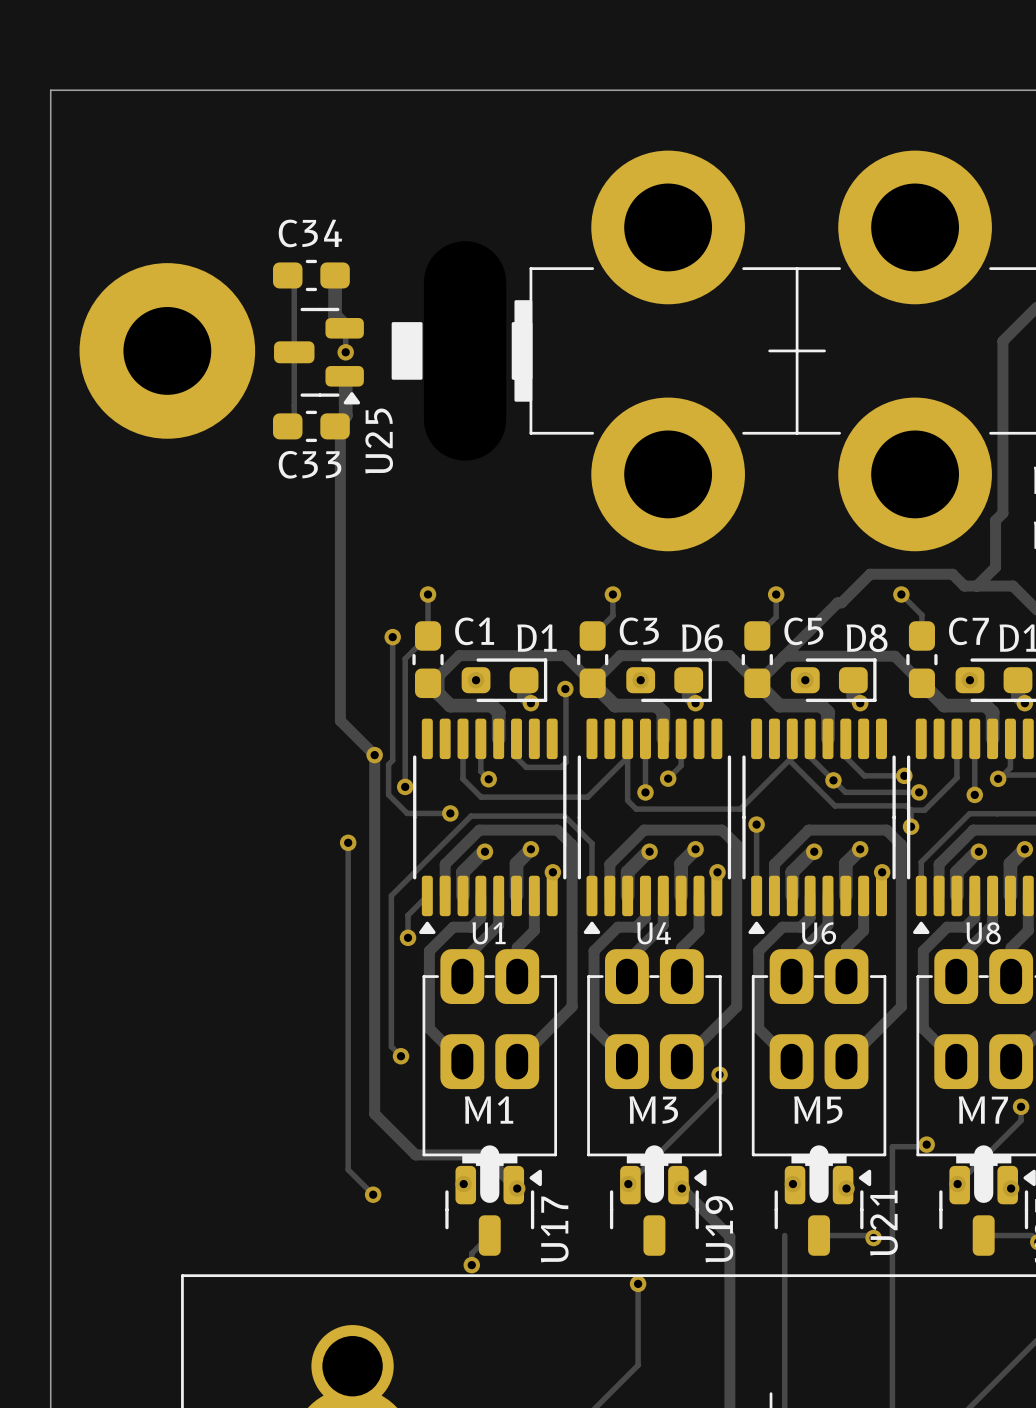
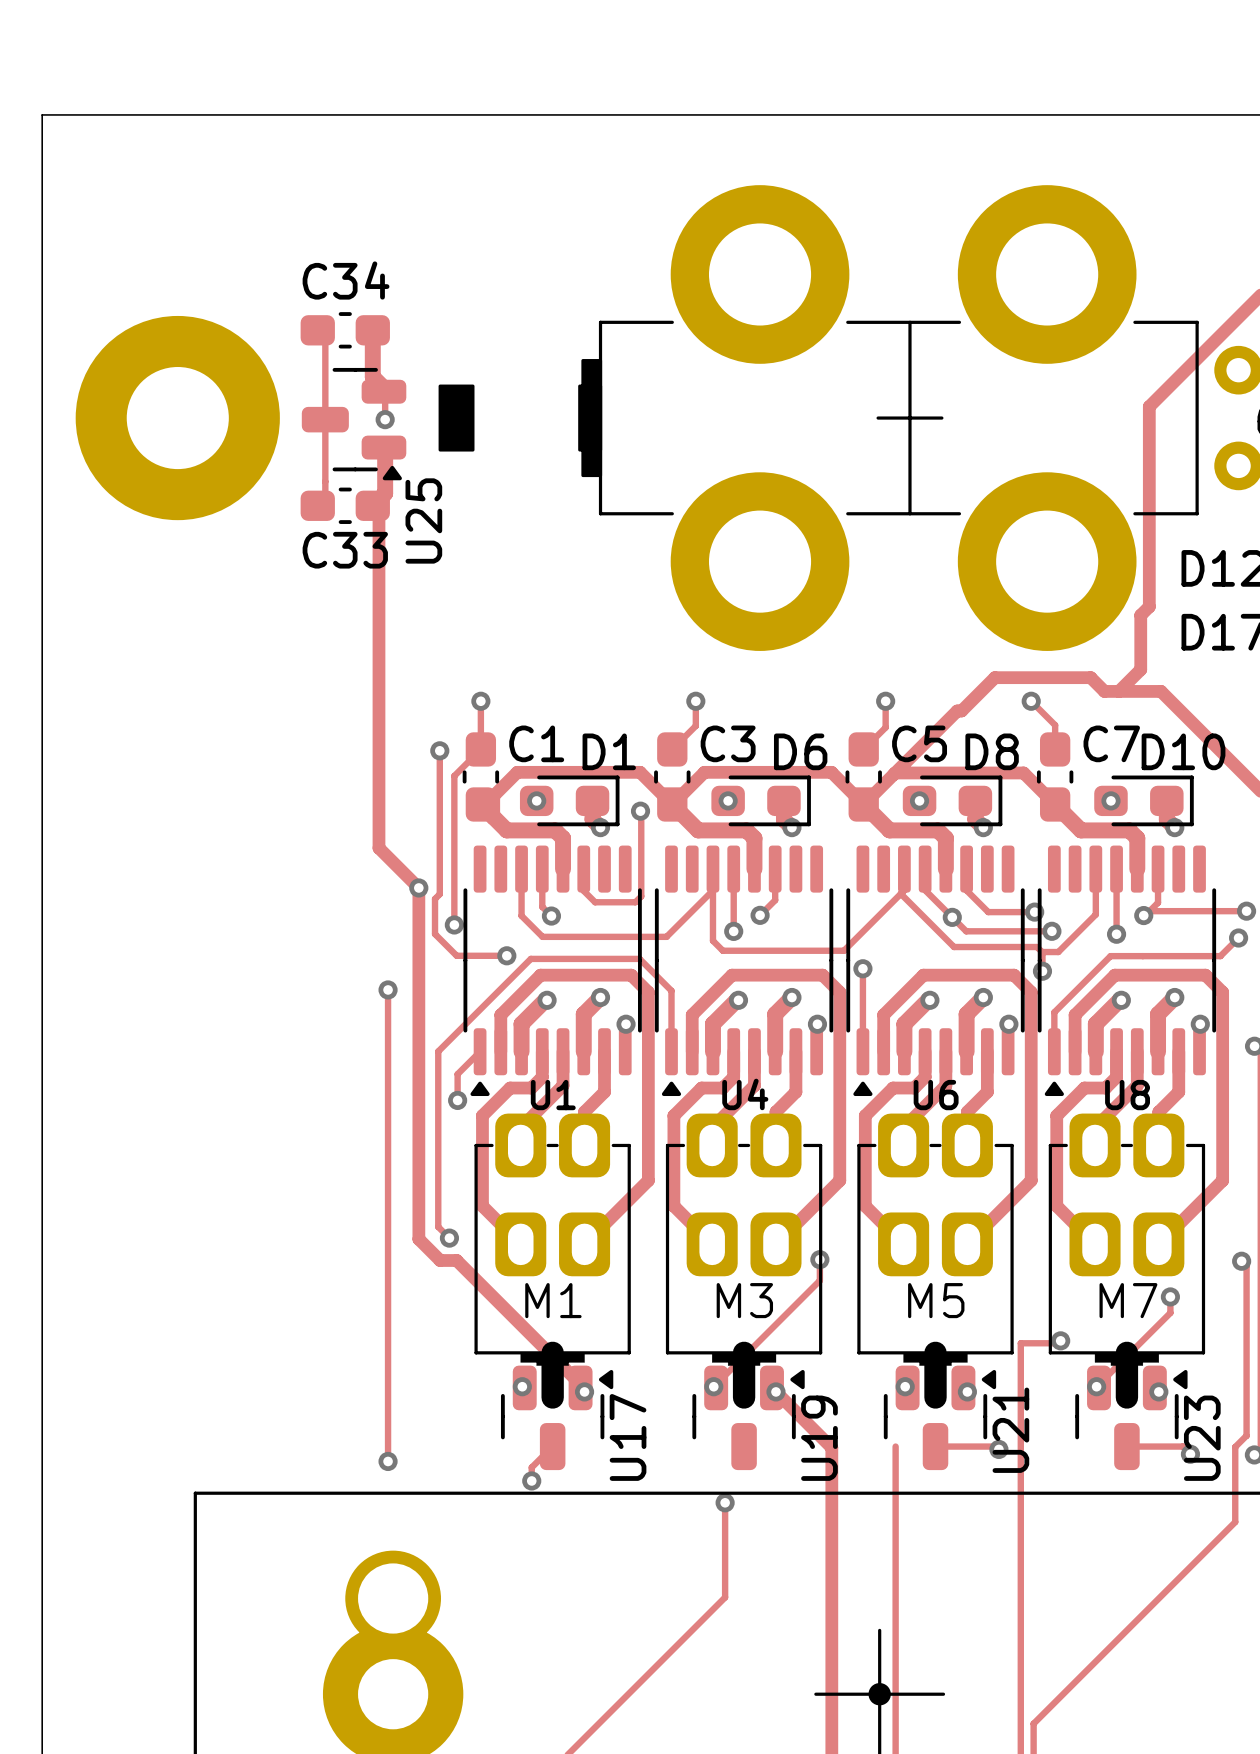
track: (374, 1057) (374, 1113) (415, 1154) (483, 1154) (515, 1187) -> (418, 1239) (440, 1260) (456, 1260) (582, 1386) (582, 1390)
track: (348, 1169) (373, 1194) -> (388, 1370) (388, 1461)
via position: (373, 1194) -> (388, 1461)

